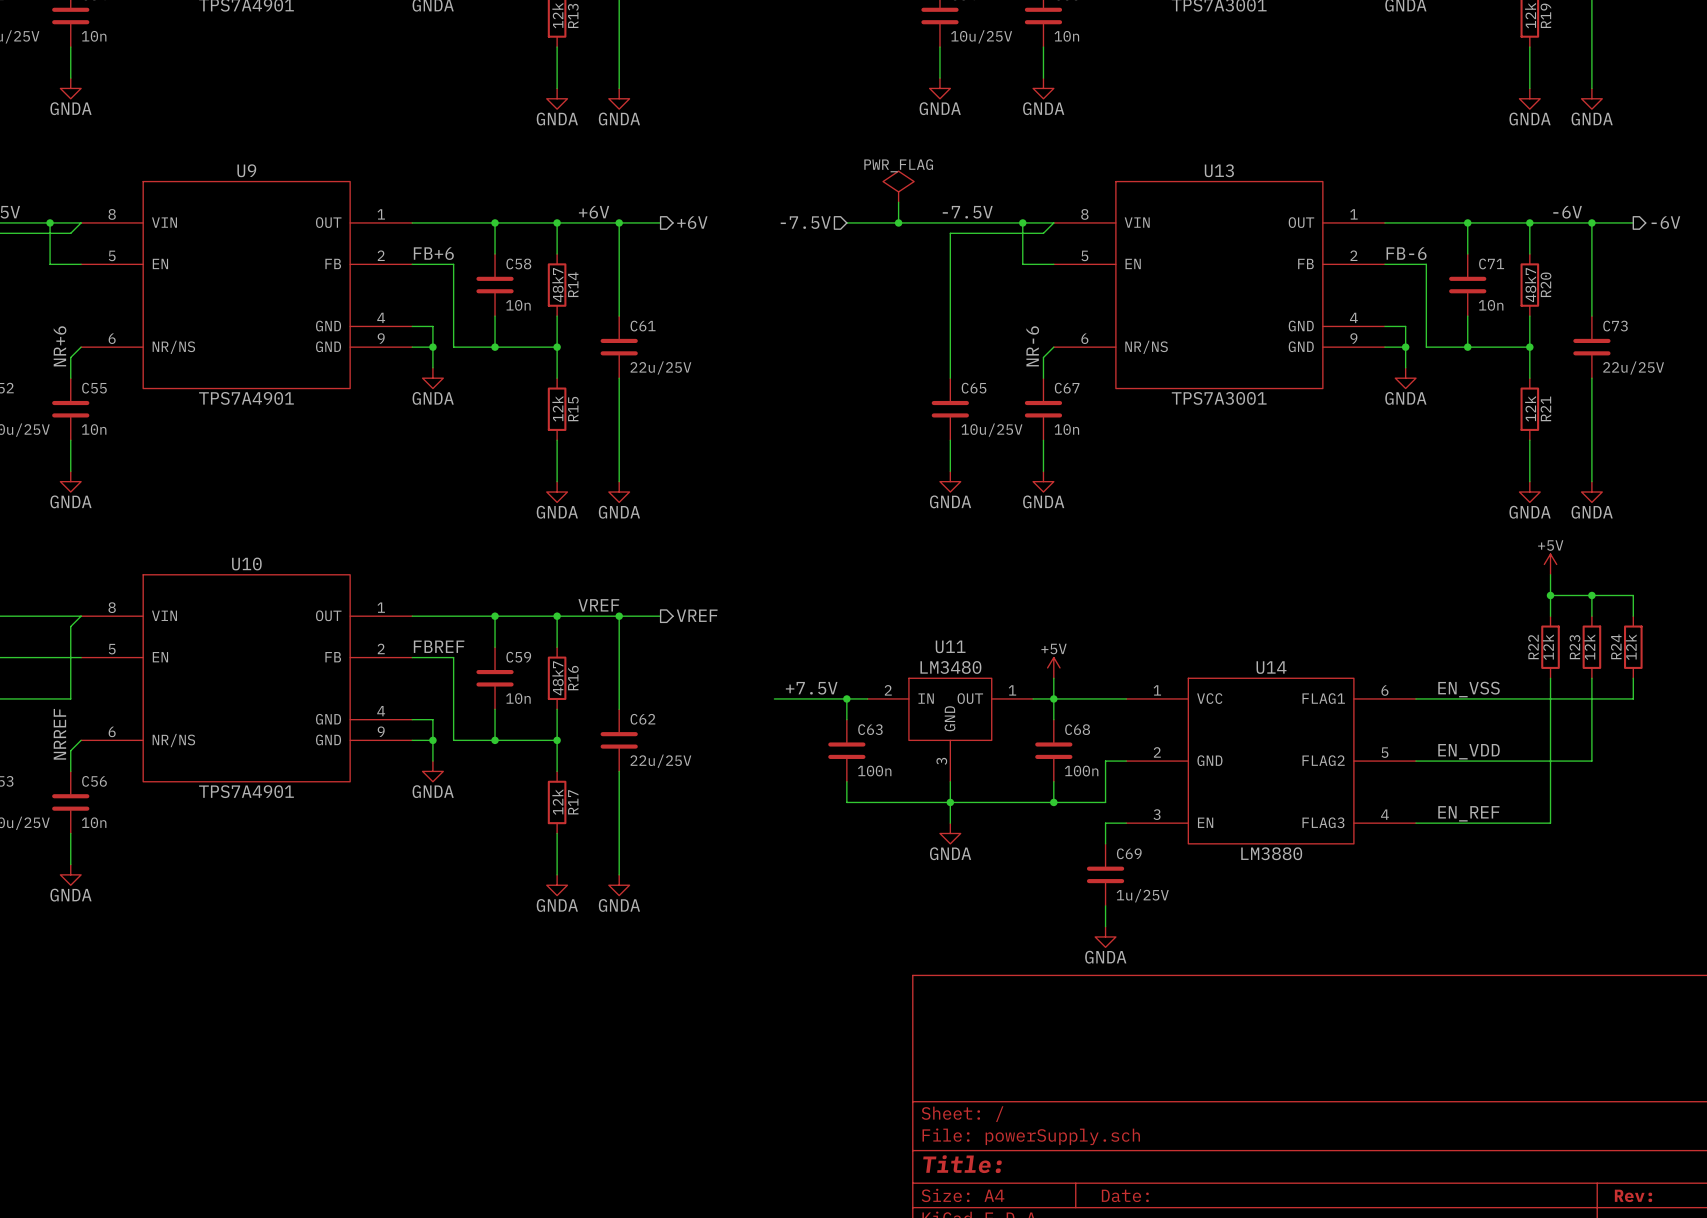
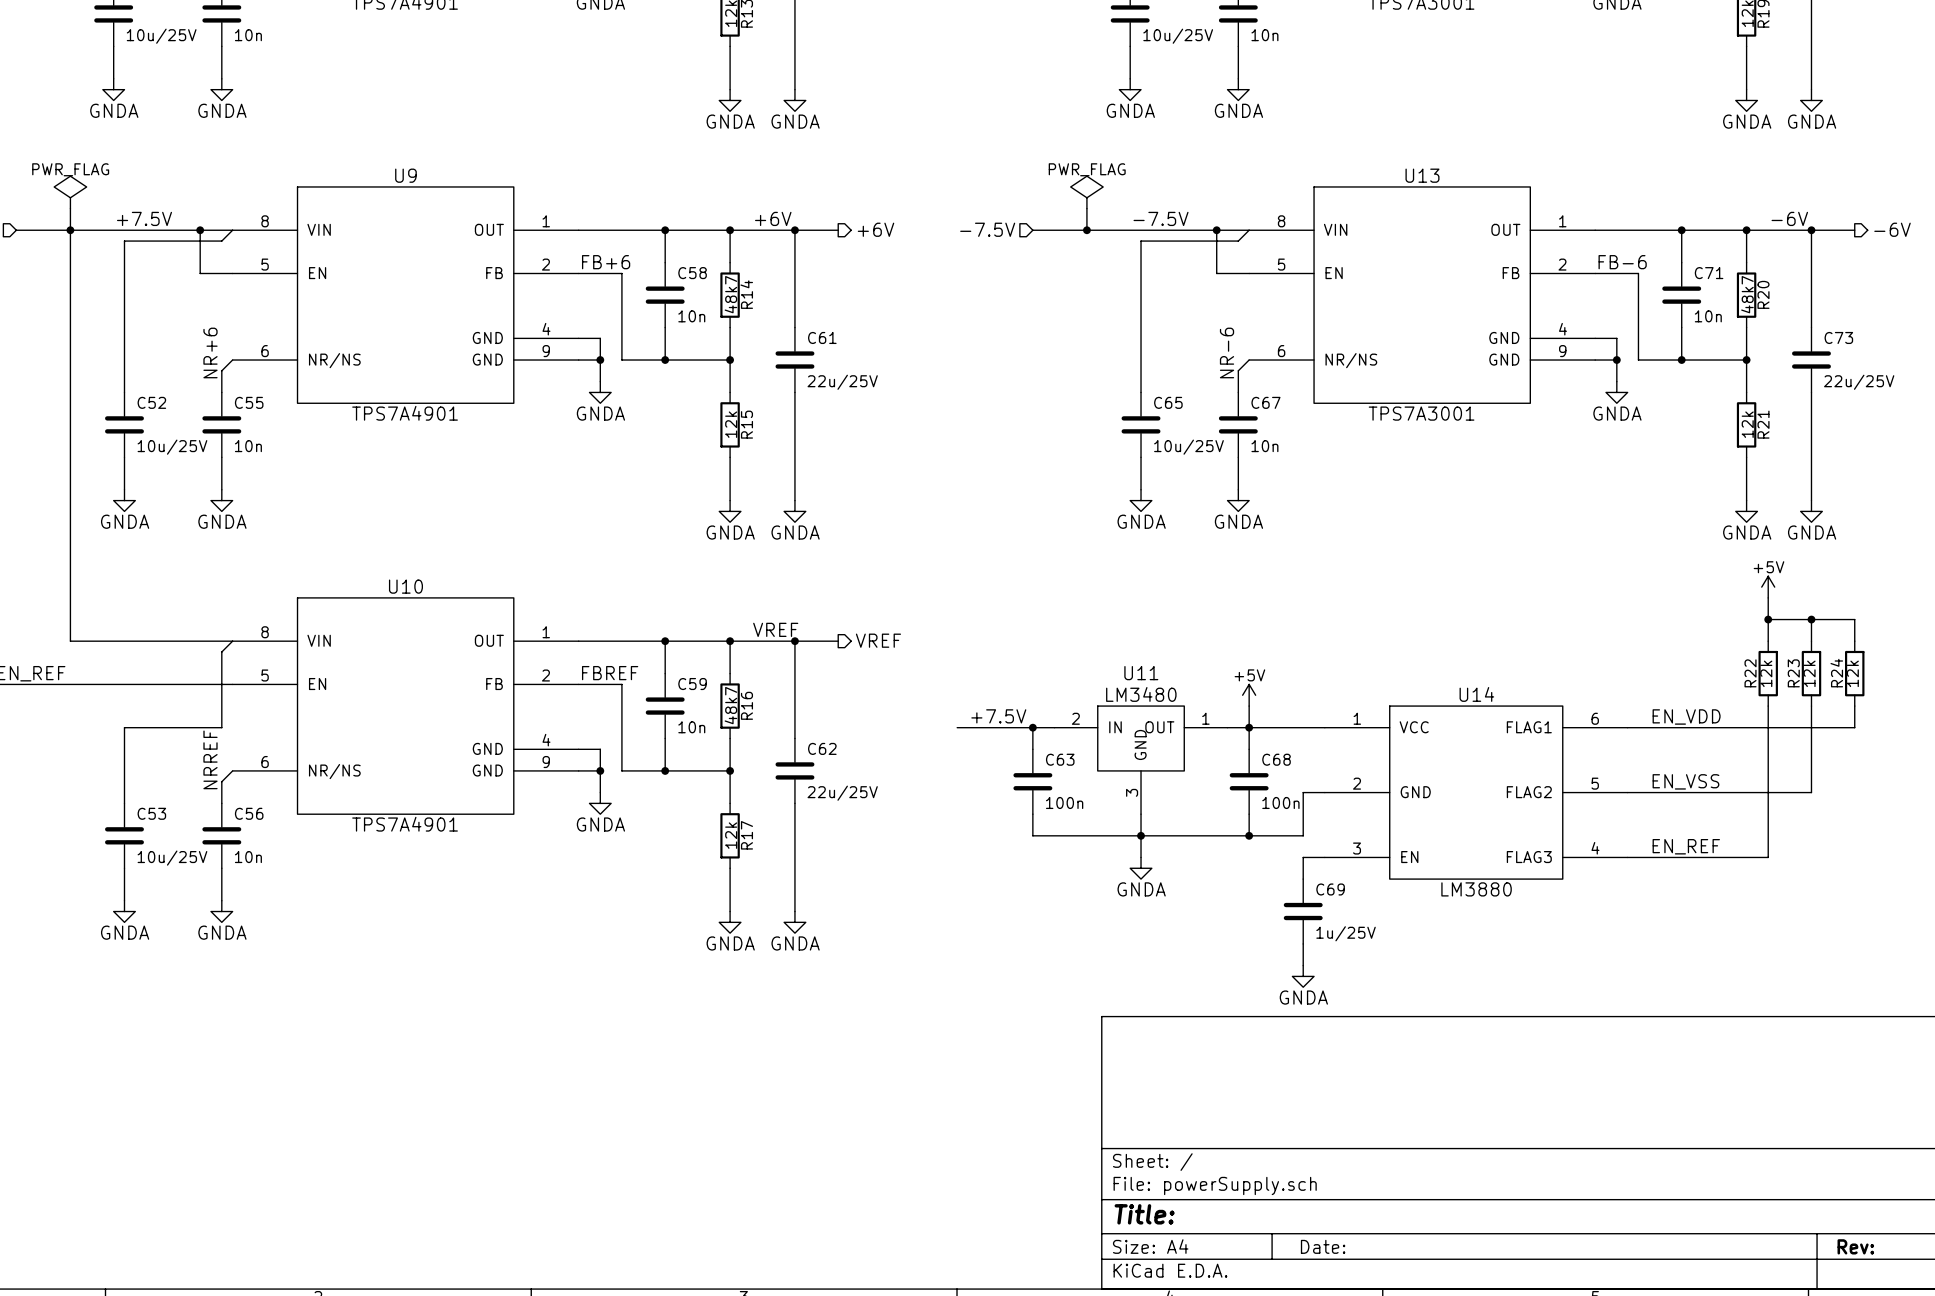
label: EN_VSS (1469, 689) -> EN_VDD (1686, 716)
label: EN_VDD (1469, 751) -> EN_VSS (1685, 781)

